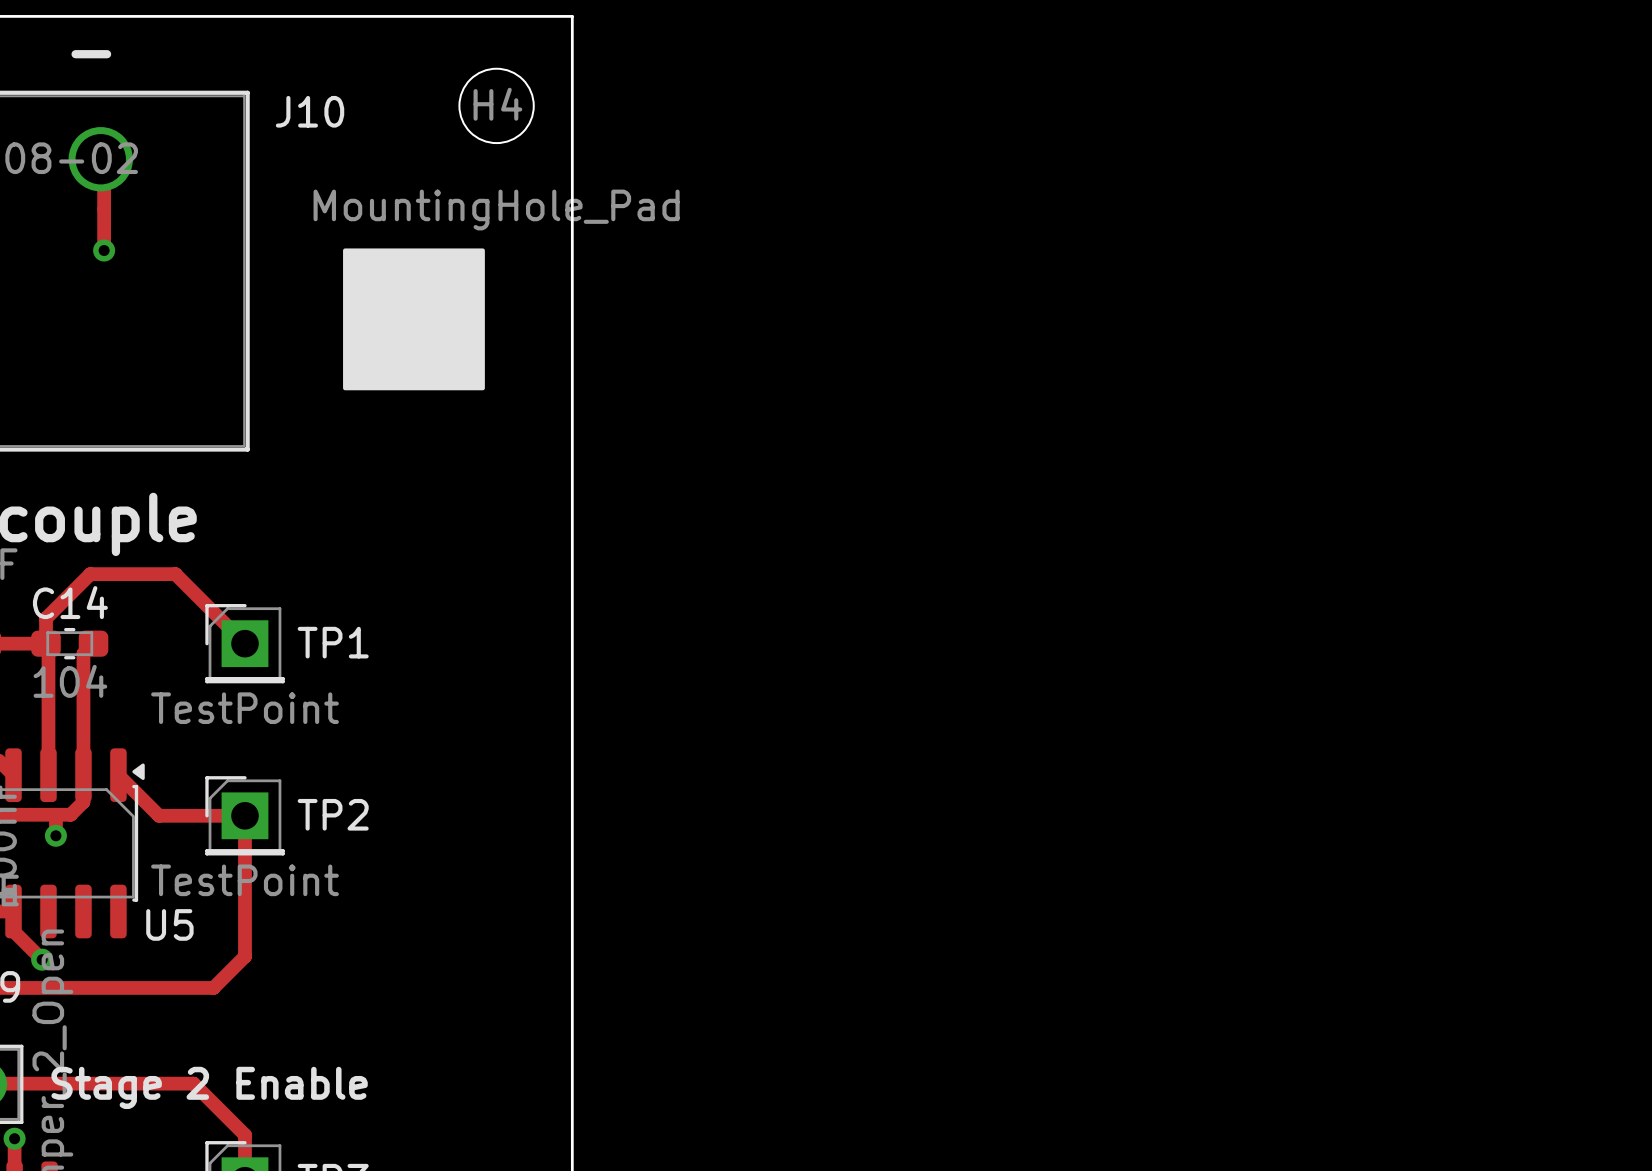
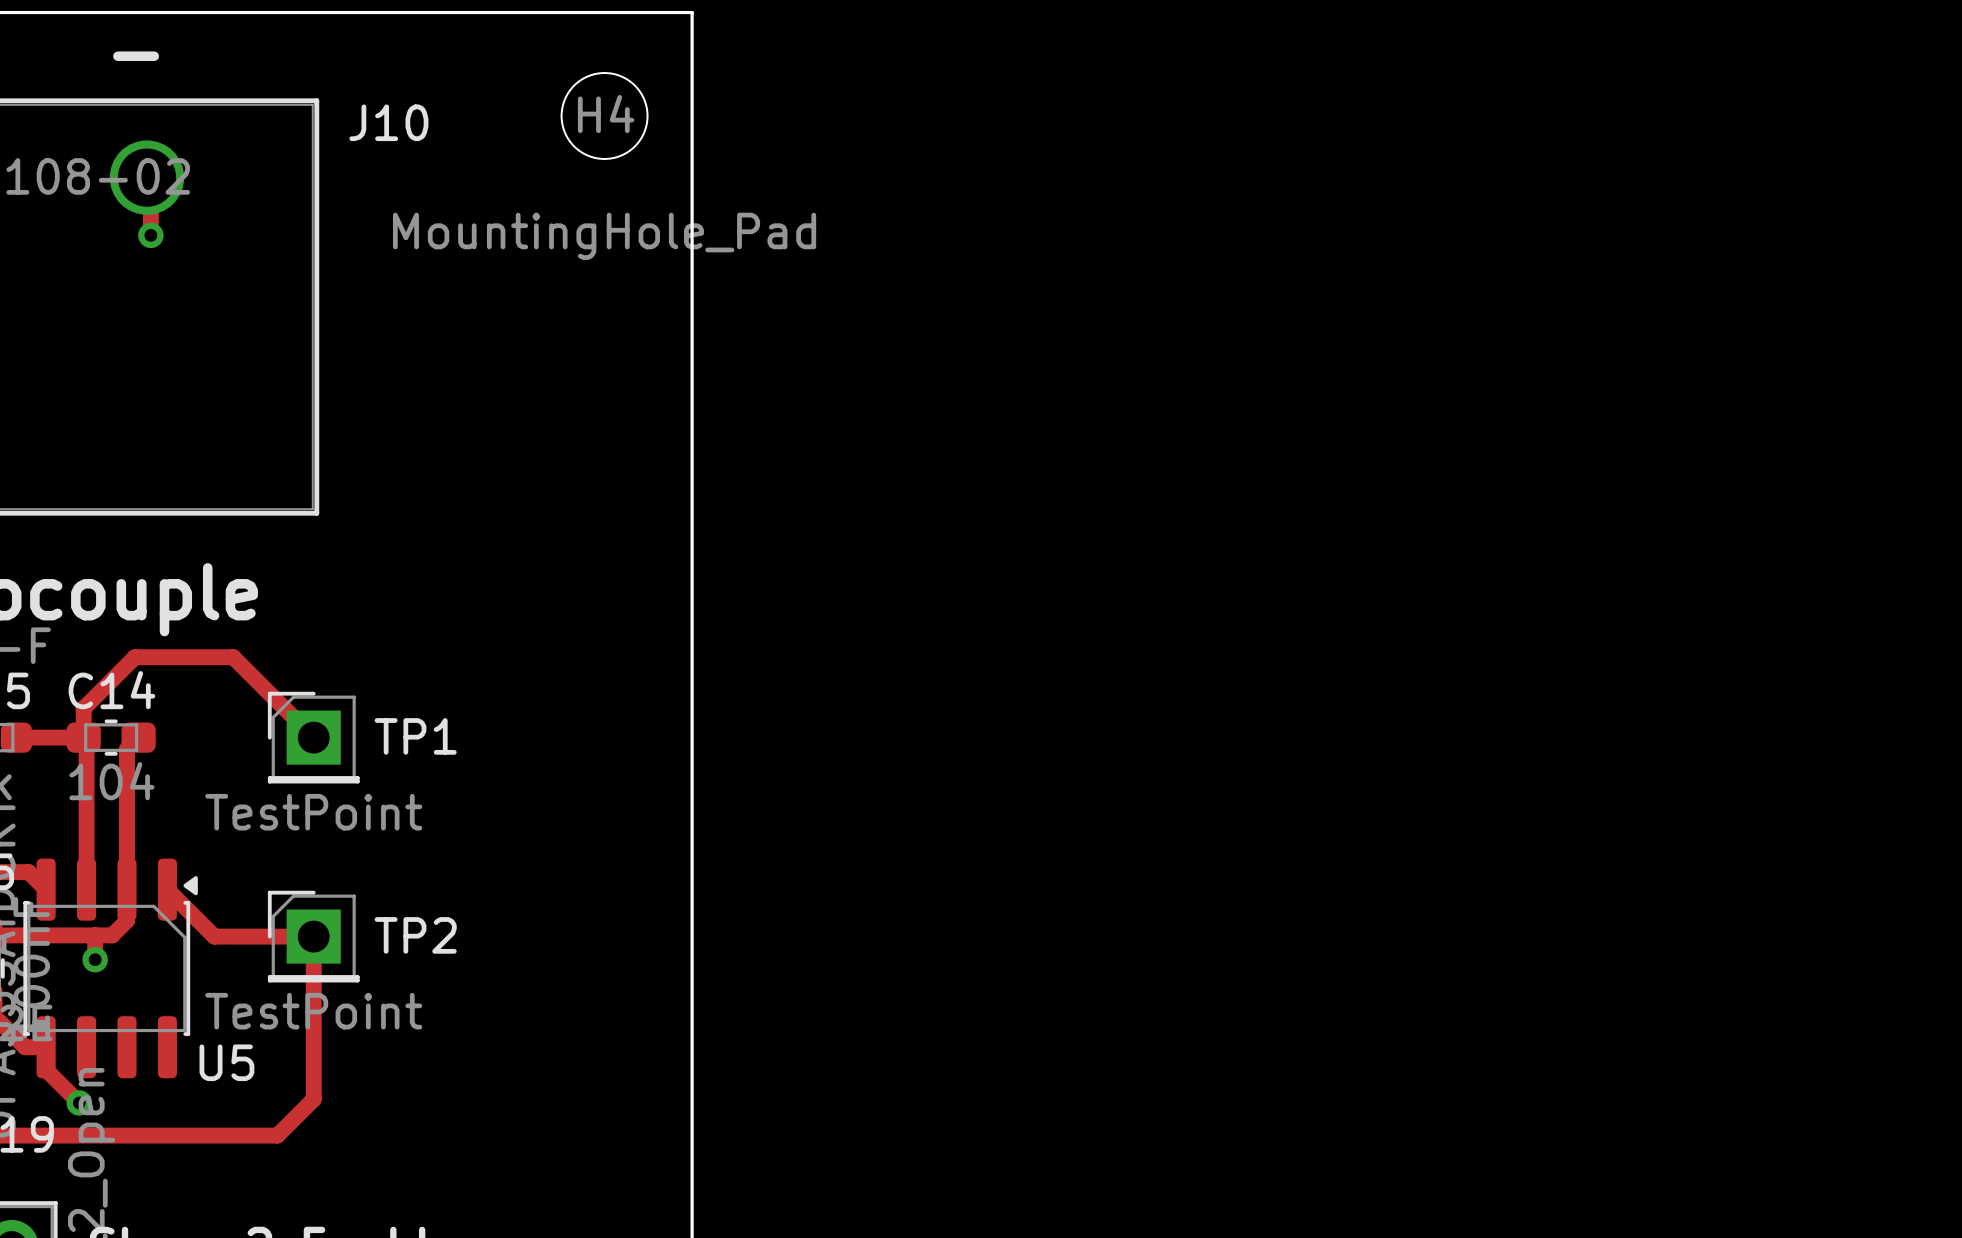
track: (104, 209) (104, 250) -> none
drawing: [343, 248, 485, 391] -> none
via position: (104, 250) -> (150, 235)

